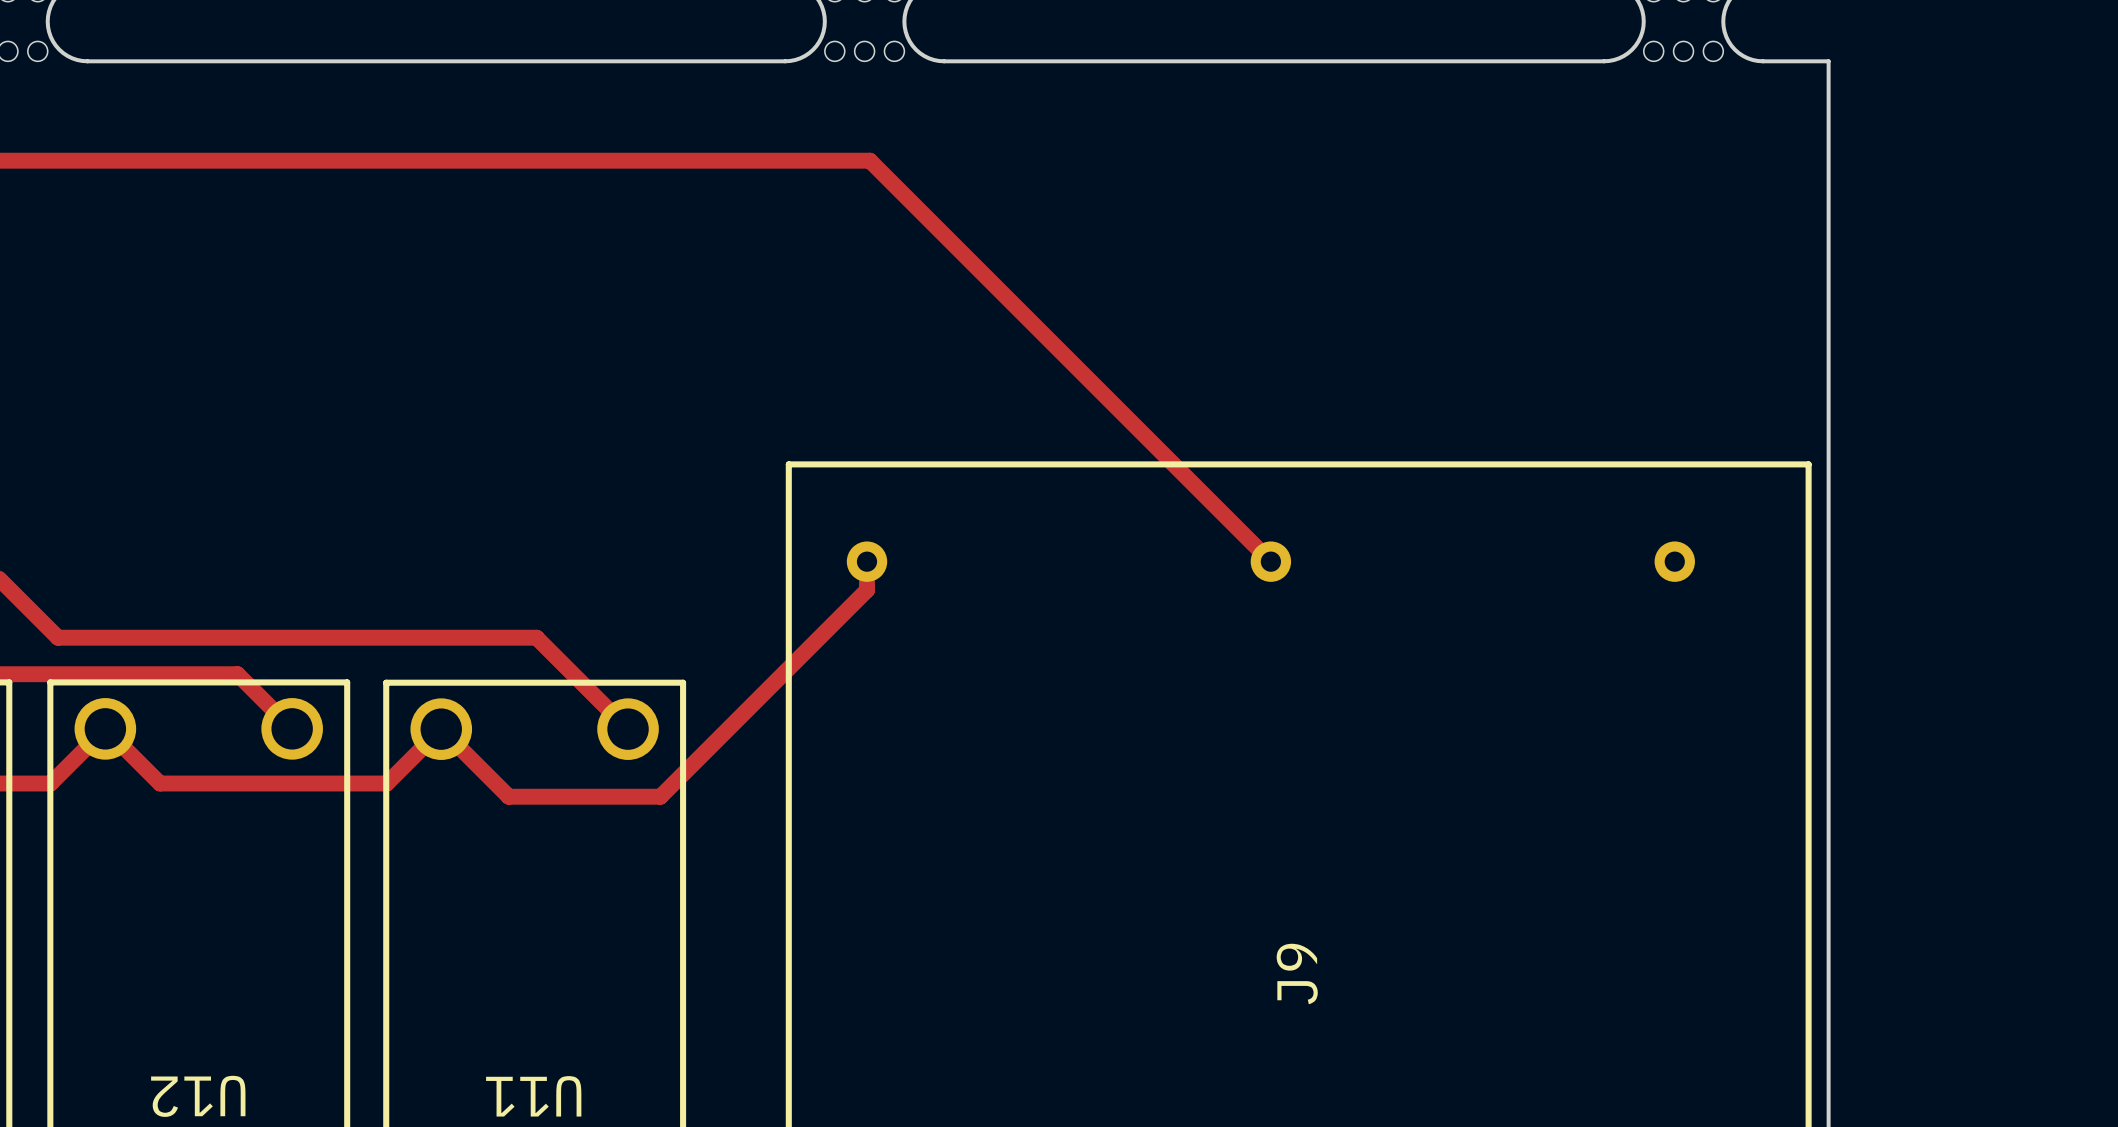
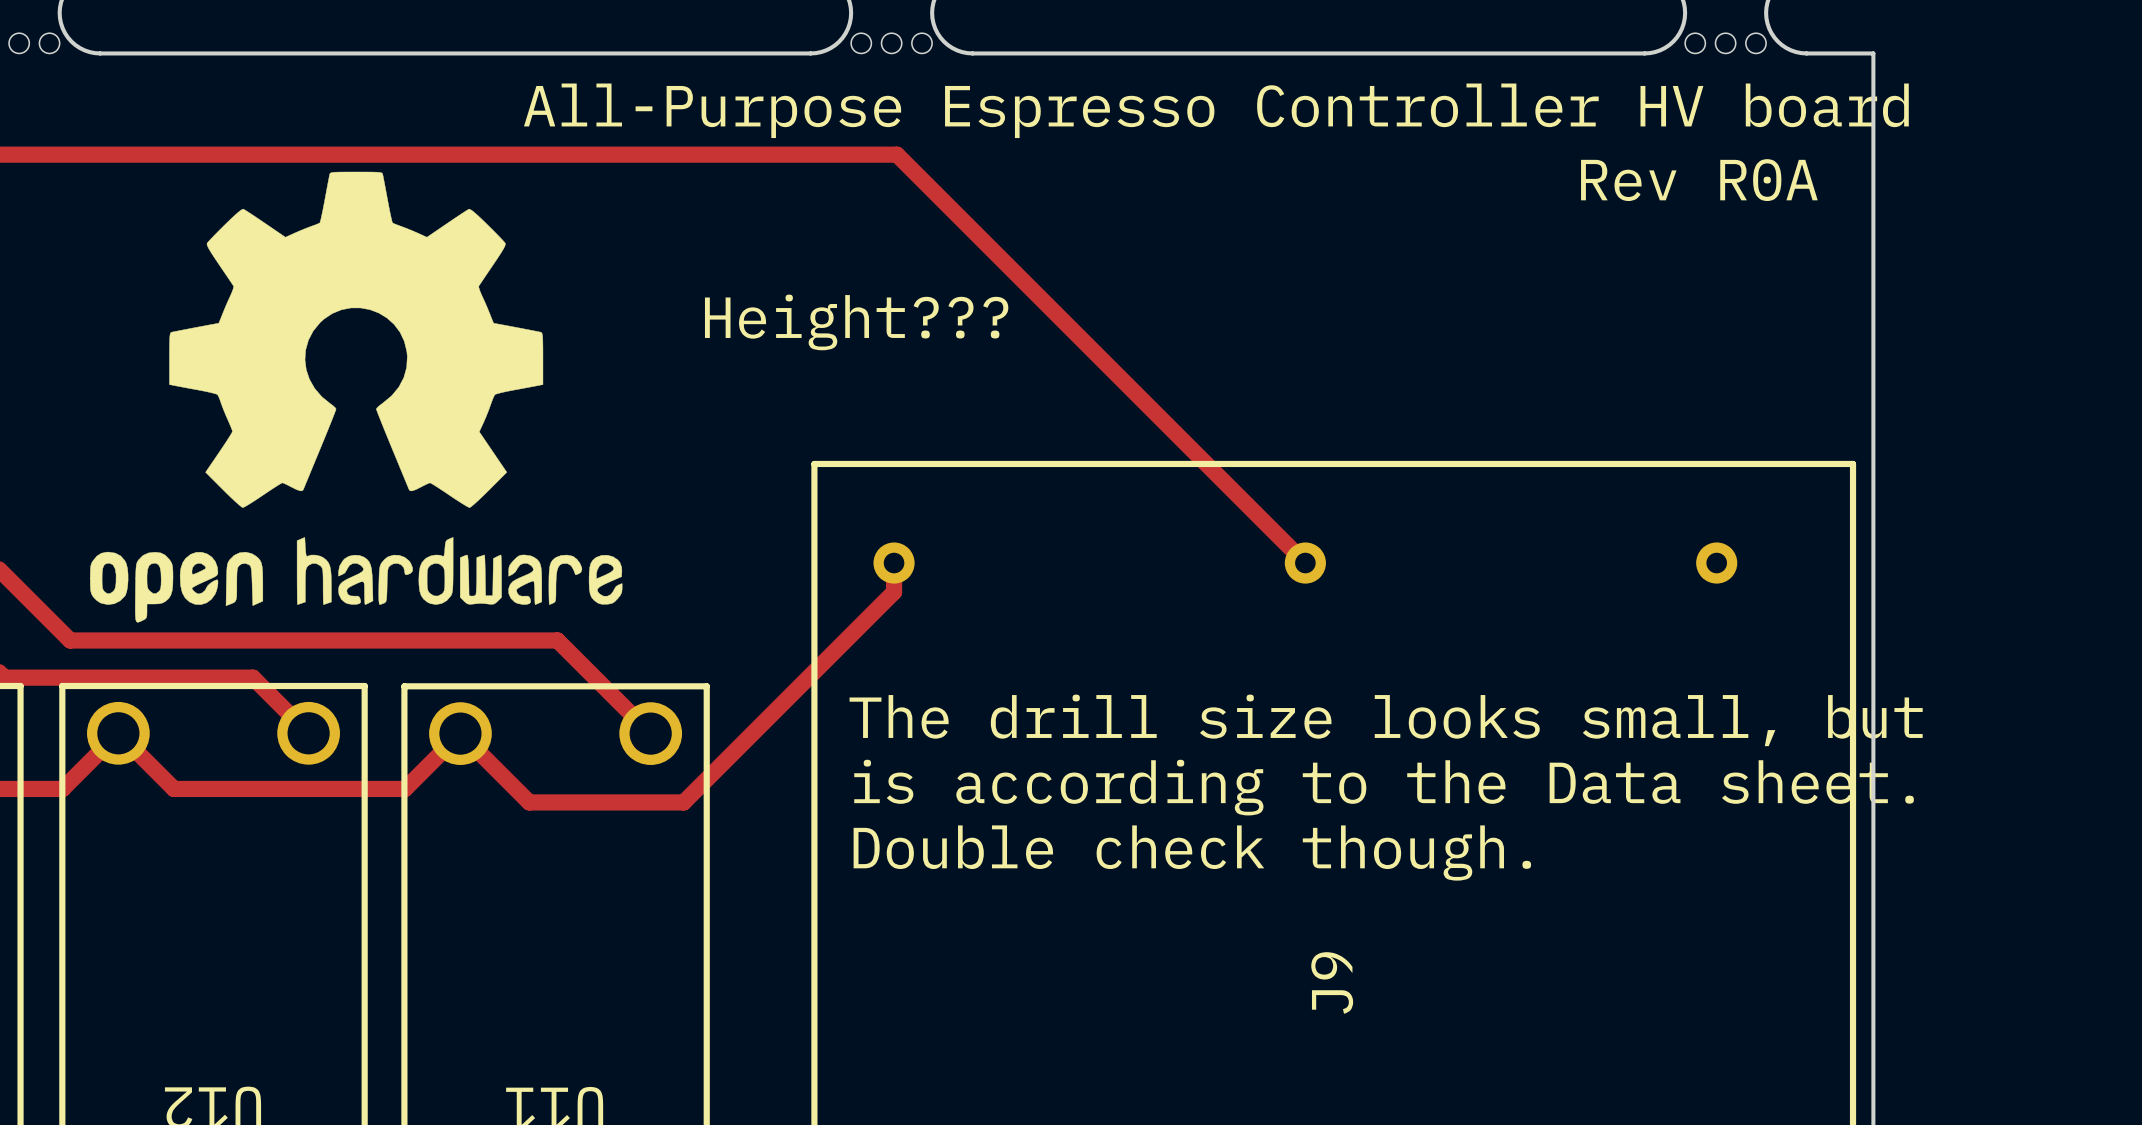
text: none -> All-Purpose Espresso Controller HV board (1216, 110)
drawing: none -> [90, 171, 623, 623]
text: none -> Rev R0A (1699, 180)
text: none -> Height??? (856, 322)
text: none -> The drill size looks small, but (1386, 720)
text: none -> is according to the Data sheet. (1384, 787)
text: none -> Double check though. (1192, 853)

